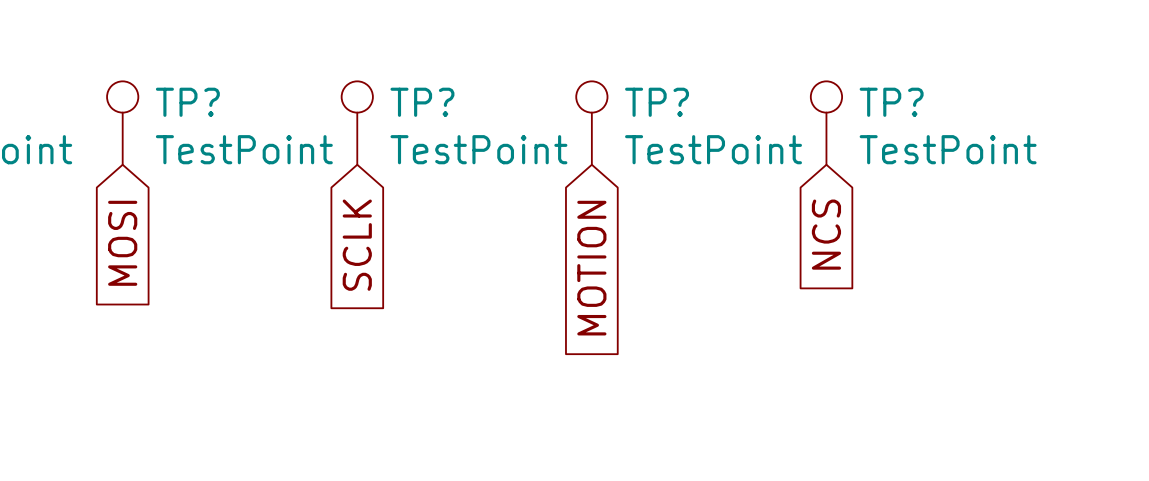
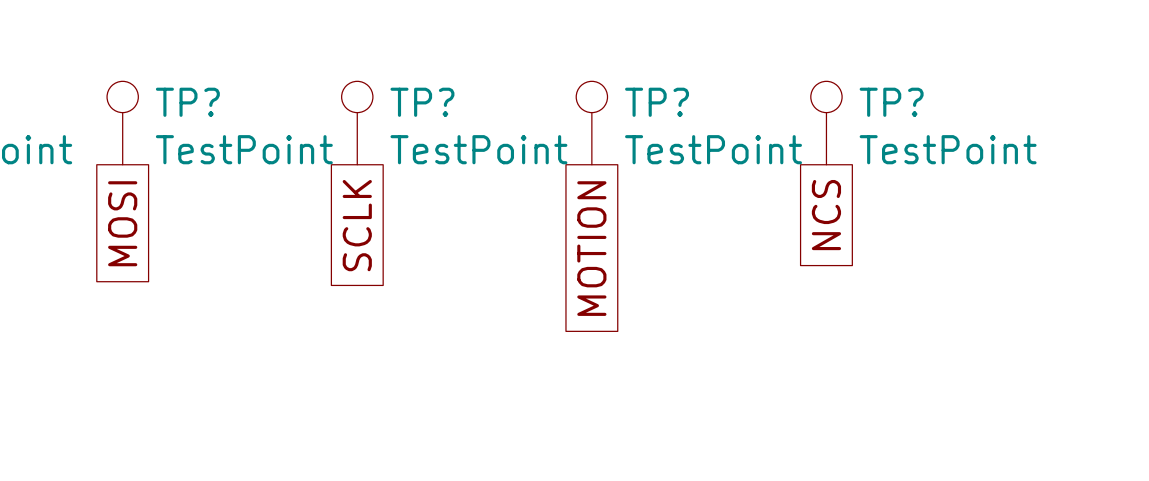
global label shape: input (826, 234) -> passive (826, 215)
global label shape: input (122, 243) -> passive (122, 223)
global label shape: input (357, 245) -> passive (357, 225)
global label shape: input (591, 268) -> passive (591, 248)

